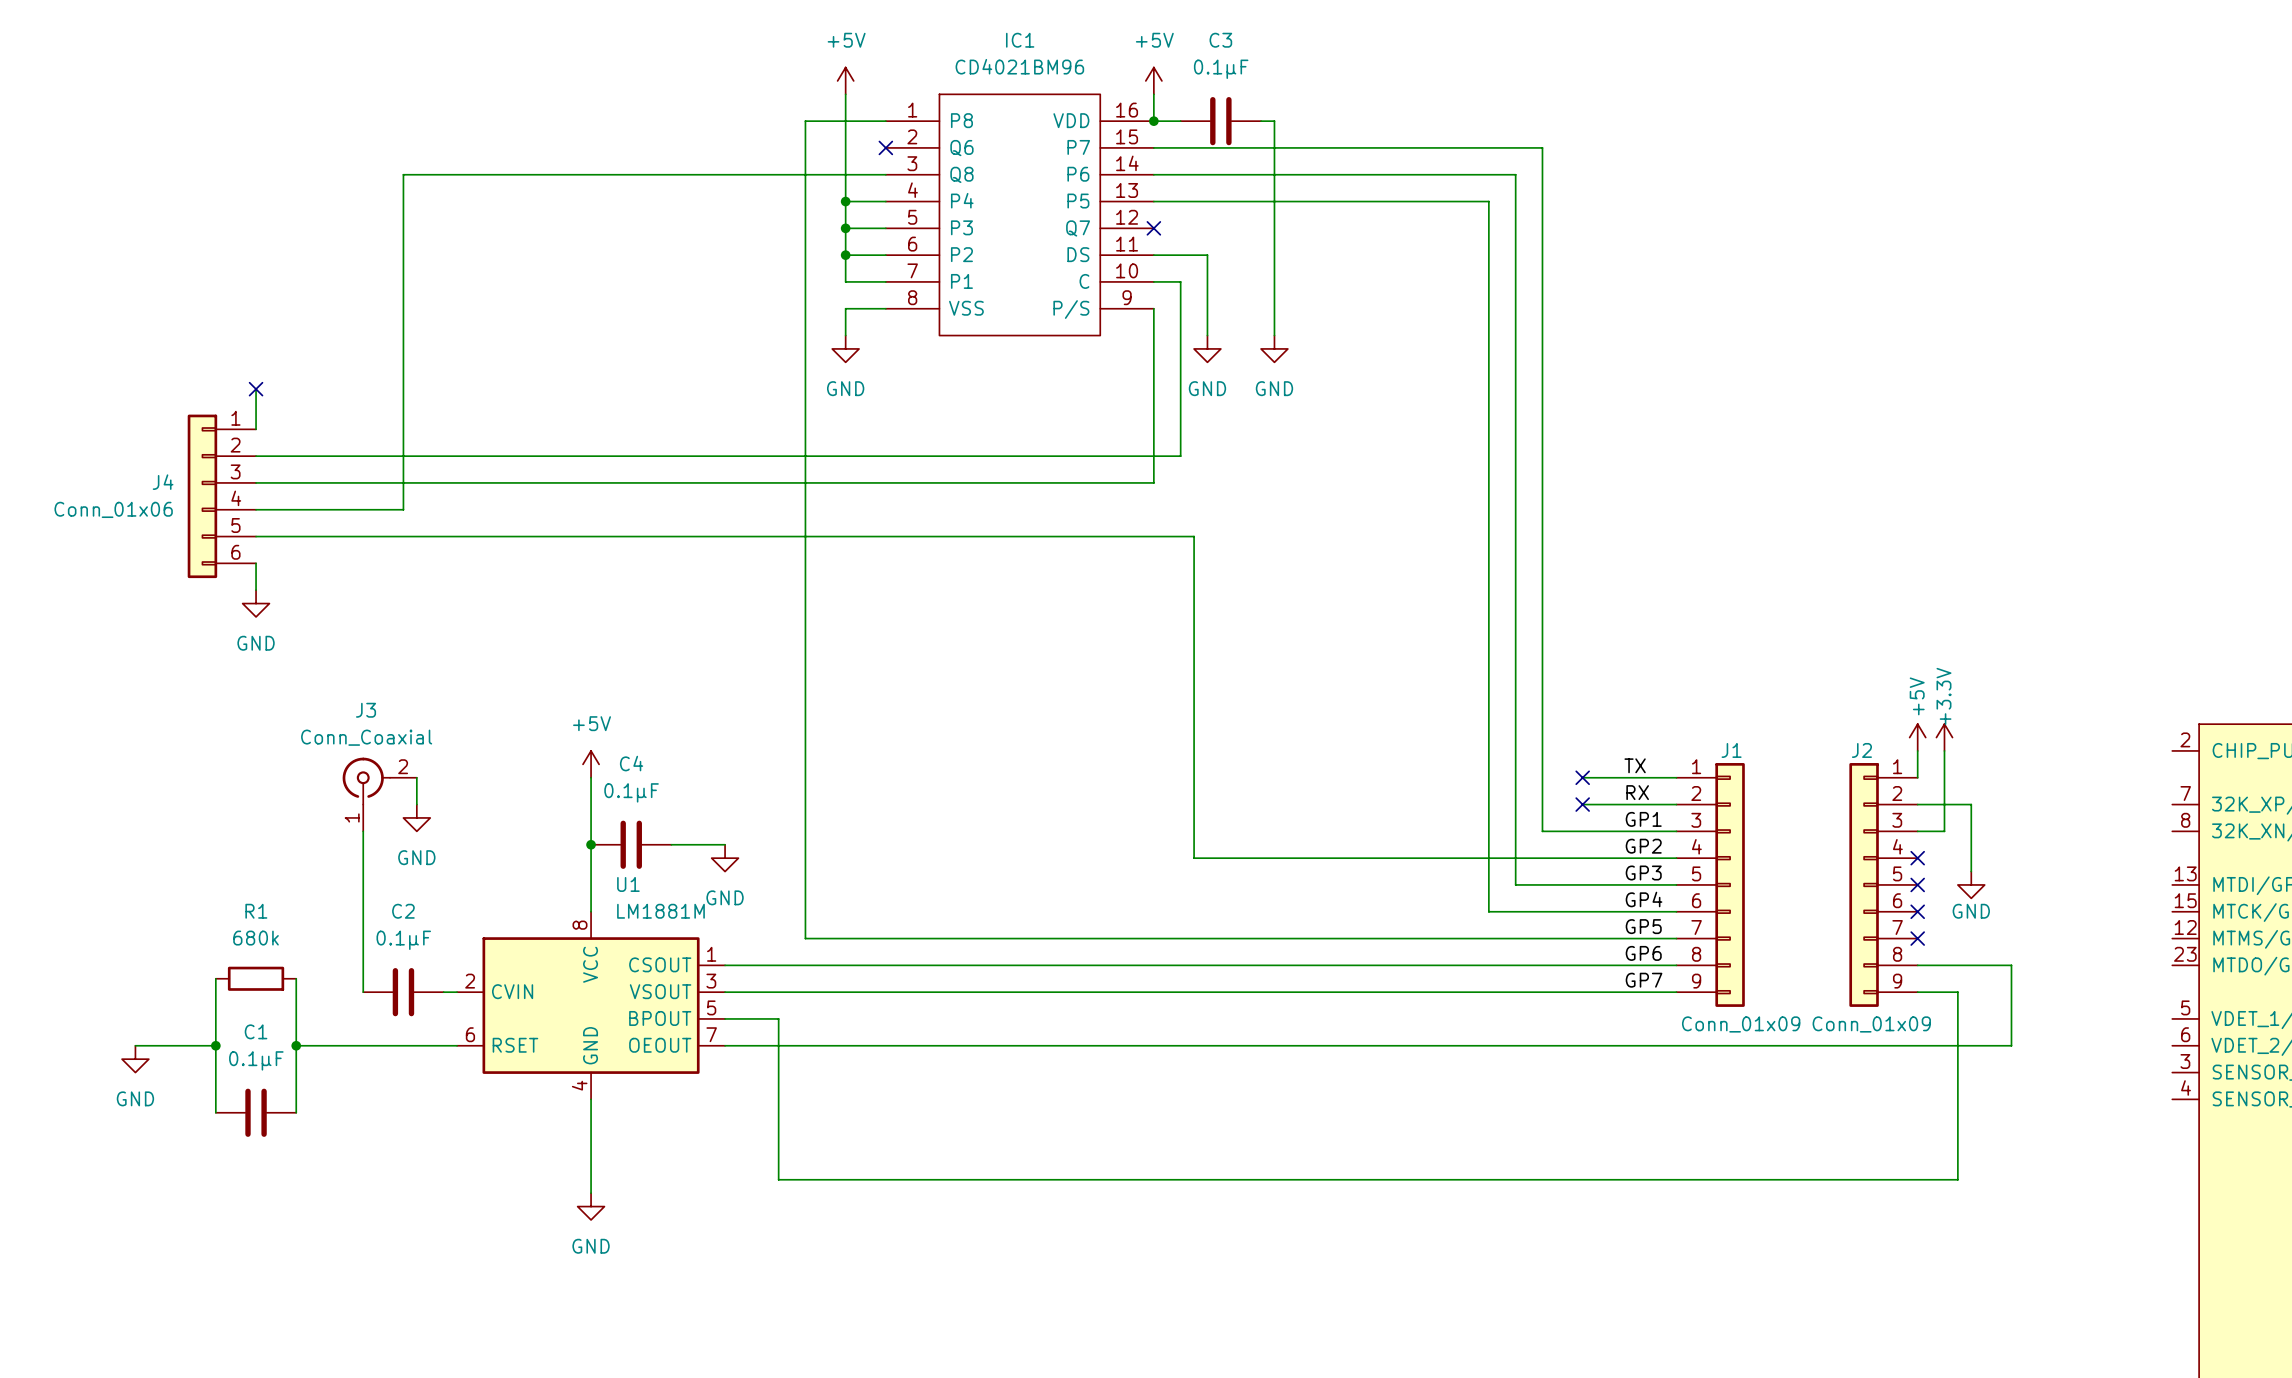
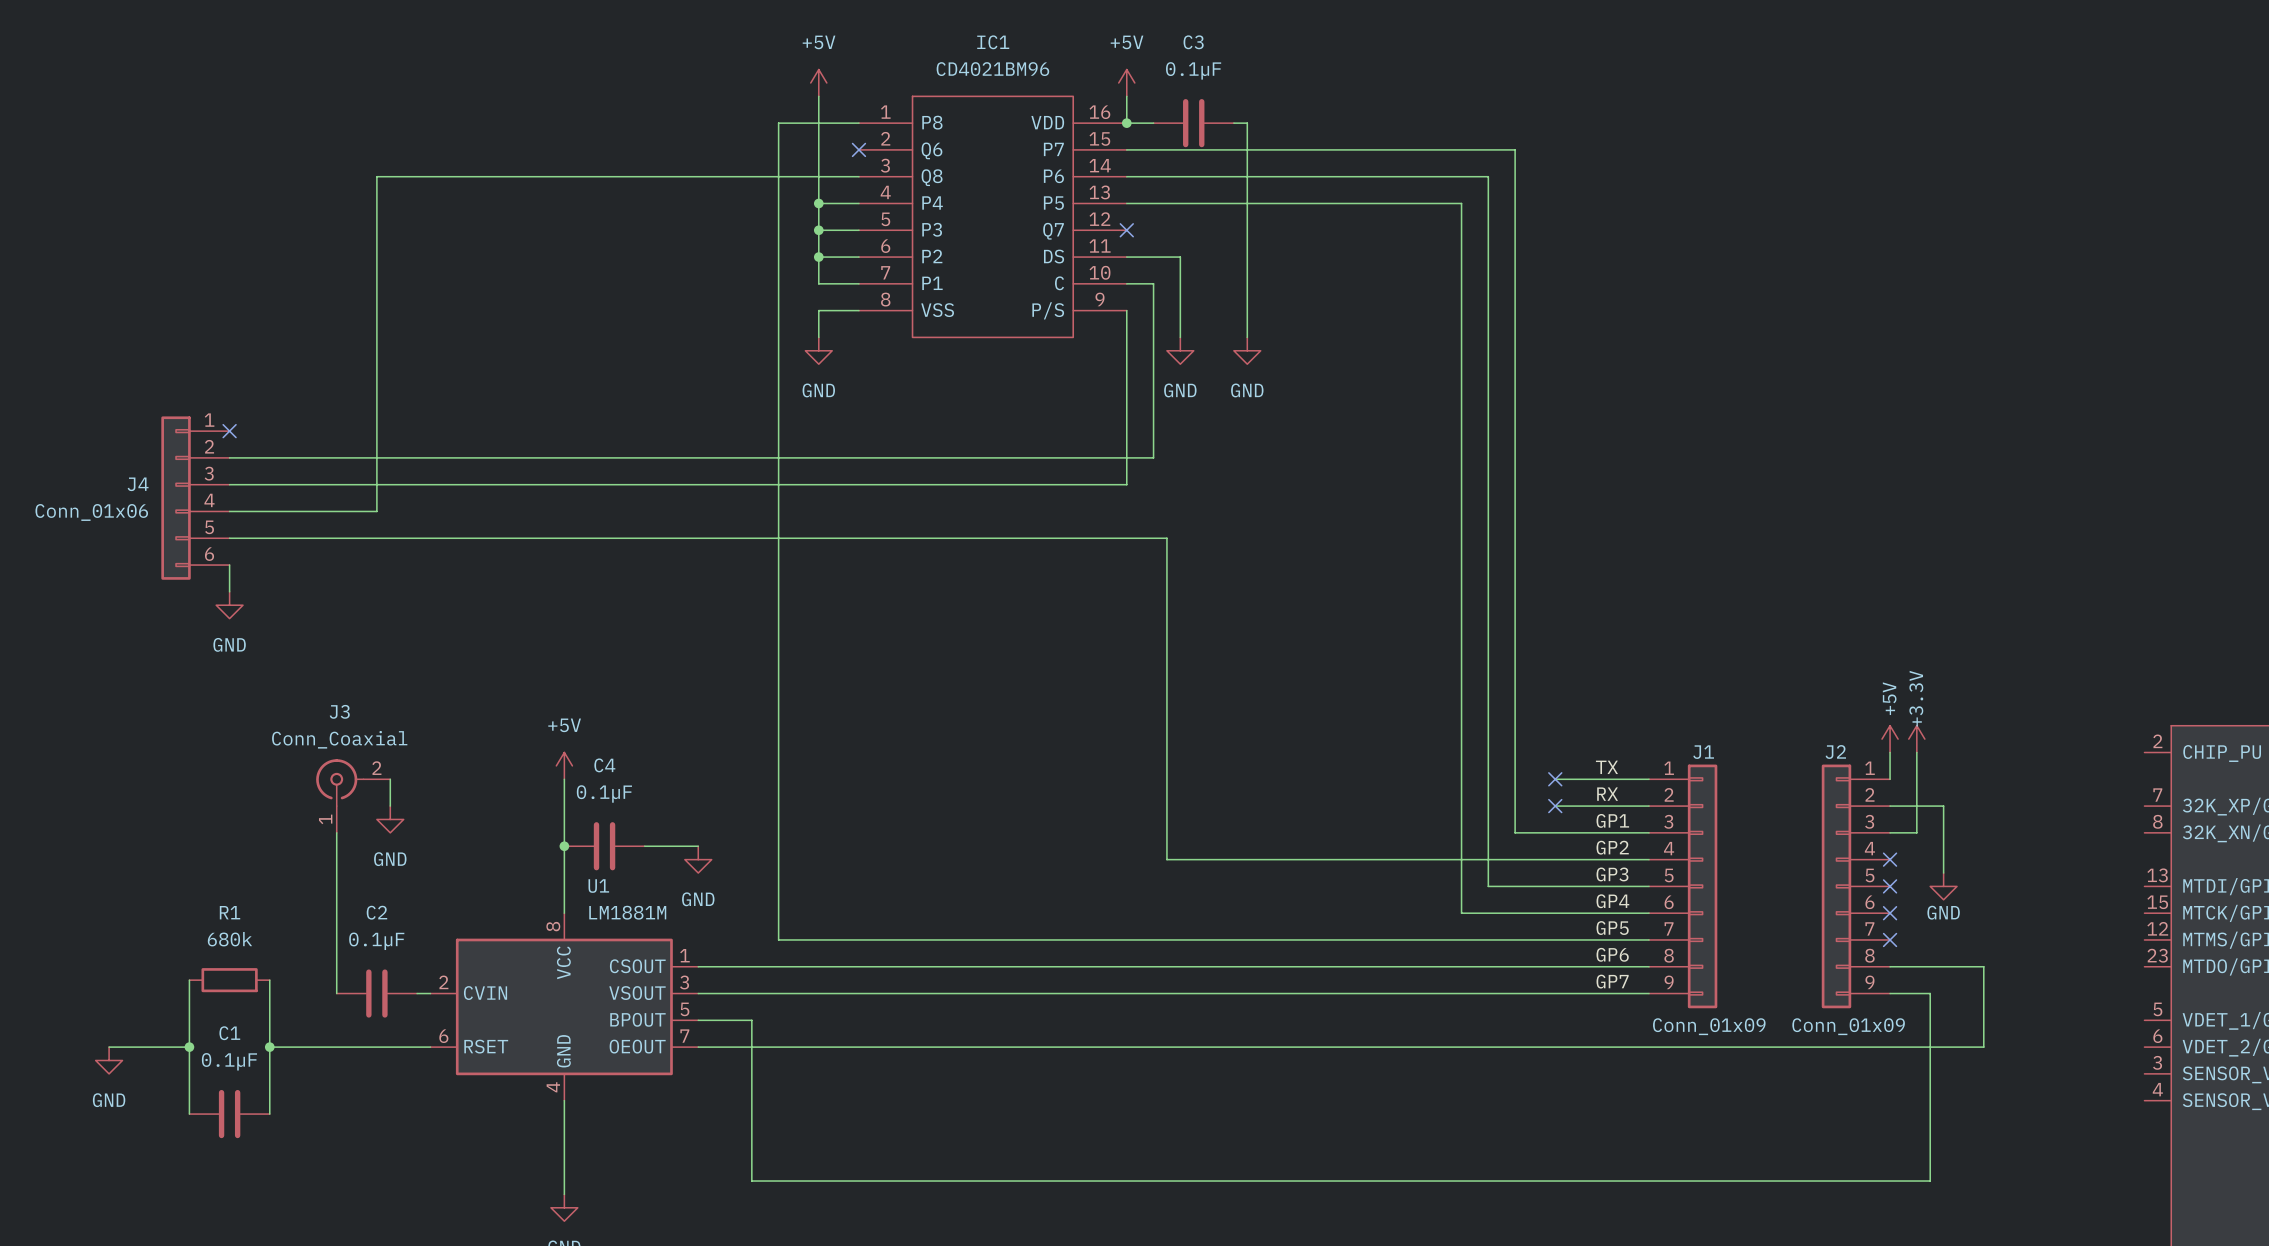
wire: (256, 389) (256, 429) -> none
no-connect mark position: (256, 389) -> (229, 431)

